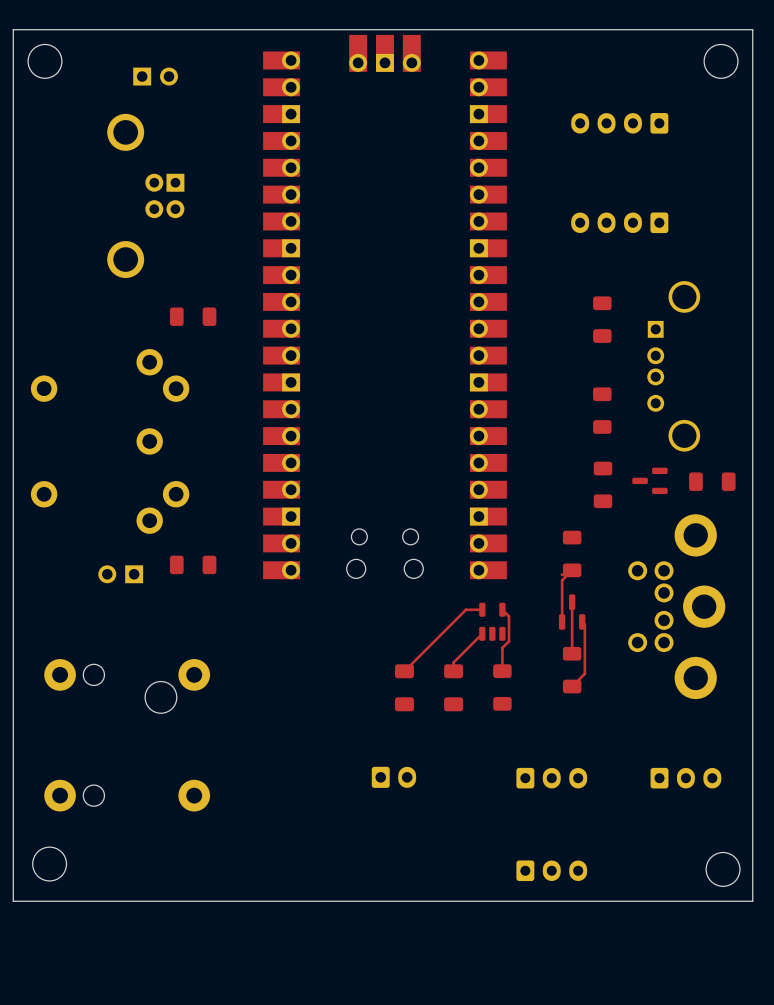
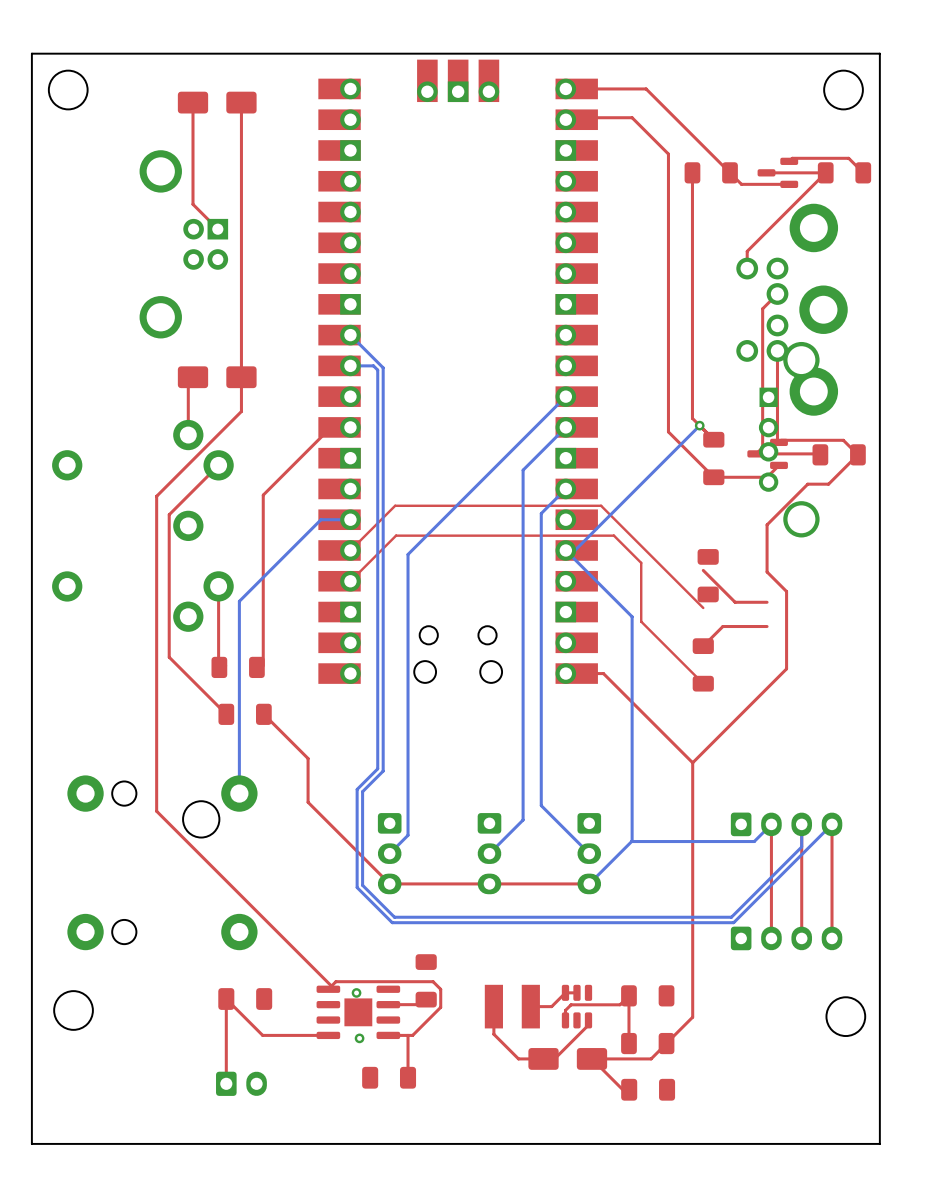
top track: none -> (565, 88) (646, 88) (741, 184) (789, 184)
top track: none -> (192, 102) (192, 204) (217, 229)
part: none -> (217, 102)
top track: none -> (241, 102) (241, 411) (156, 496) (156, 811) (331, 986)
part: (155, 76) -> none
top track: none -> (567, 117) (632, 117) (668, 154) (668, 431) (713, 477) (767, 477) (779, 465)
part: (619, 123) -> none
top track: none -> (789, 161) (792, 158) (848, 158) (863, 172)
top track: none -> (692, 172) (692, 418) (713, 439)
part: none -> (711, 172)
top track: none -> (766, 172) (825, 172) (747, 251) (747, 268)
part: none -> (777, 172)
part: none -> (844, 172)
part: (619, 222) -> none
top track: none -> (777, 293) (762, 308) (762, 447) (756, 453) (819, 453)
part: none -> (792, 309)
bottom track: none -> (350, 335) (383, 367) (383, 771) (362, 791) (362, 885) (394, 917) (731, 917) (801, 846) (801, 824)
top track: none -> (777, 350) (777, 440)
bottom track: none -> (350, 365) (373, 365) (377, 370) (377, 768) (357, 789) (357, 887) (392, 922) (733, 922) (832, 824)
top track: none -> (192, 377) (188, 381) (188, 435) (192, 430)
part: none -> (217, 377)
part: (193, 316) -> none
part: (602, 319) -> none
bottom track: none -> (565, 396) (408, 554) (408, 835) (389, 853)
bottom track: none -> (699, 425) (574, 550) (565, 550) (632, 616) (632, 841)
via: none -> (699, 425)
top track: none -> (330, 427) (263, 495) (263, 665)
bottom track: none -> (565, 427) (523, 470) (523, 820) (489, 853)
top track: none -> (781, 440) (843, 440) (857, 454) (828, 484) (807, 484) (767, 524) (767, 572) (786, 591) (786, 668) (692, 762)
part: none -> (839, 454)
top track: none -> (218, 465) (169, 514) (169, 657) (226, 714)
bottom track: none -> (565, 488) (541, 513) (541, 805) (589, 853)
part position: (602, 410) -> (713, 458)
bottom track: none -> (350, 519) (320, 519) (239, 601) (239, 793)
top track: none -> (350, 550) (395, 505) (601, 505) (703, 607)
top track: none -> (703, 570) (735, 602) (767, 602)
part position: (649, 480) -> (767, 453)
part: (712, 481) -> none
top track: none -> (350, 581) (396, 535) (613, 535) (641, 562) (641, 621) (703, 683)
top track: none -> (218, 586) (218, 658) (225, 665)
top track: none -> (767, 626) (722, 626) (703, 646)
part position: (572, 553) -> (703, 664)
top track: none -> (565, 673) (603, 673) (692, 762)
top track: (572, 570) (562, 580) (562, 621) -> none
part: (120, 574) -> none
top track: (561, 574) (562, 575) -> none
top track: (572, 602) (572, 653) -> none
part: none -> (245, 714)
top track: none -> (263, 714) (308, 758) (308, 802) (389, 883) (589, 883)
part: (676, 606) -> none
top track: (482, 609) (465, 609) (404, 671) -> none
top track: (502, 609) (509, 616) (509, 641) (502, 647) (502, 671) -> none
part: (572, 612) -> none
part: (492, 621) -> none
top track: (582, 621) (584, 624) (584, 673) (572, 686) -> none
top track: (482, 633) (453, 662) (453, 671) -> none
top track: none -> (692, 762) (692, 1017) (666, 1043)
part: (572, 670) -> none
part: (404, 687) -> none
part: (453, 687) -> none
part: (502, 687) -> none
top track: none -> (771, 824) (771, 938)
bottom track: none -> (771, 824) (754, 841) (632, 841)
part: none -> (786, 824)
top track: none -> (801, 824) (801, 938)
top track: none -> (832, 824) (832, 938)
bottom track: none -> (632, 841) (589, 883)
part: none -> (389, 853)
part: none -> (489, 853)
part: (393, 777) -> none
part rotation: 0° (551, 778) -> 90° clockwise (589, 853)
part position: (551, 778) -> (589, 853)
part: (685, 778) -> none
part: none -> (786, 938)
part: none -> (426, 980)
top track: none -> (328, 989) (335, 981) (433, 981) (440, 989) (440, 1007) (412, 1035) (388, 1035)
via: none -> (356, 992)
top track: none -> (576, 992) (565, 992) (551, 1006) (530, 1006)
part: none -> (647, 995)
part: none -> (245, 999)
top track: none -> (421, 1004) (388, 1004)
top track: none -> (493, 1006) (493, 1034) (518, 1058) (543, 1058)
part: none -> (512, 1006)
part: none -> (576, 1006)
part: none -> (358, 1012)
part: (551, 870) -> none
top track: none -> (565, 1020) (565, 1010) (571, 1004) (620, 1004) (628, 995) (628, 1043)
top track: none -> (588, 1025) (554, 1058)
top track: none -> (328, 1035) (262, 1035) (226, 999) (226, 1083)
top track: none -> (408, 1035) (408, 1077)
via: none -> (359, 1038)
part: none -> (647, 1043)
top track: none -> (666, 1043) (651, 1058) (591, 1058) (622, 1089)
board edge: (752, 901) (13, 901) -> (879, 1053) (879, 1143) (31, 1143) (31, 1053)
part: none -> (567, 1058)
part: none -> (389, 1077)
part: none -> (241, 1083)
part: none -> (648, 1089)

